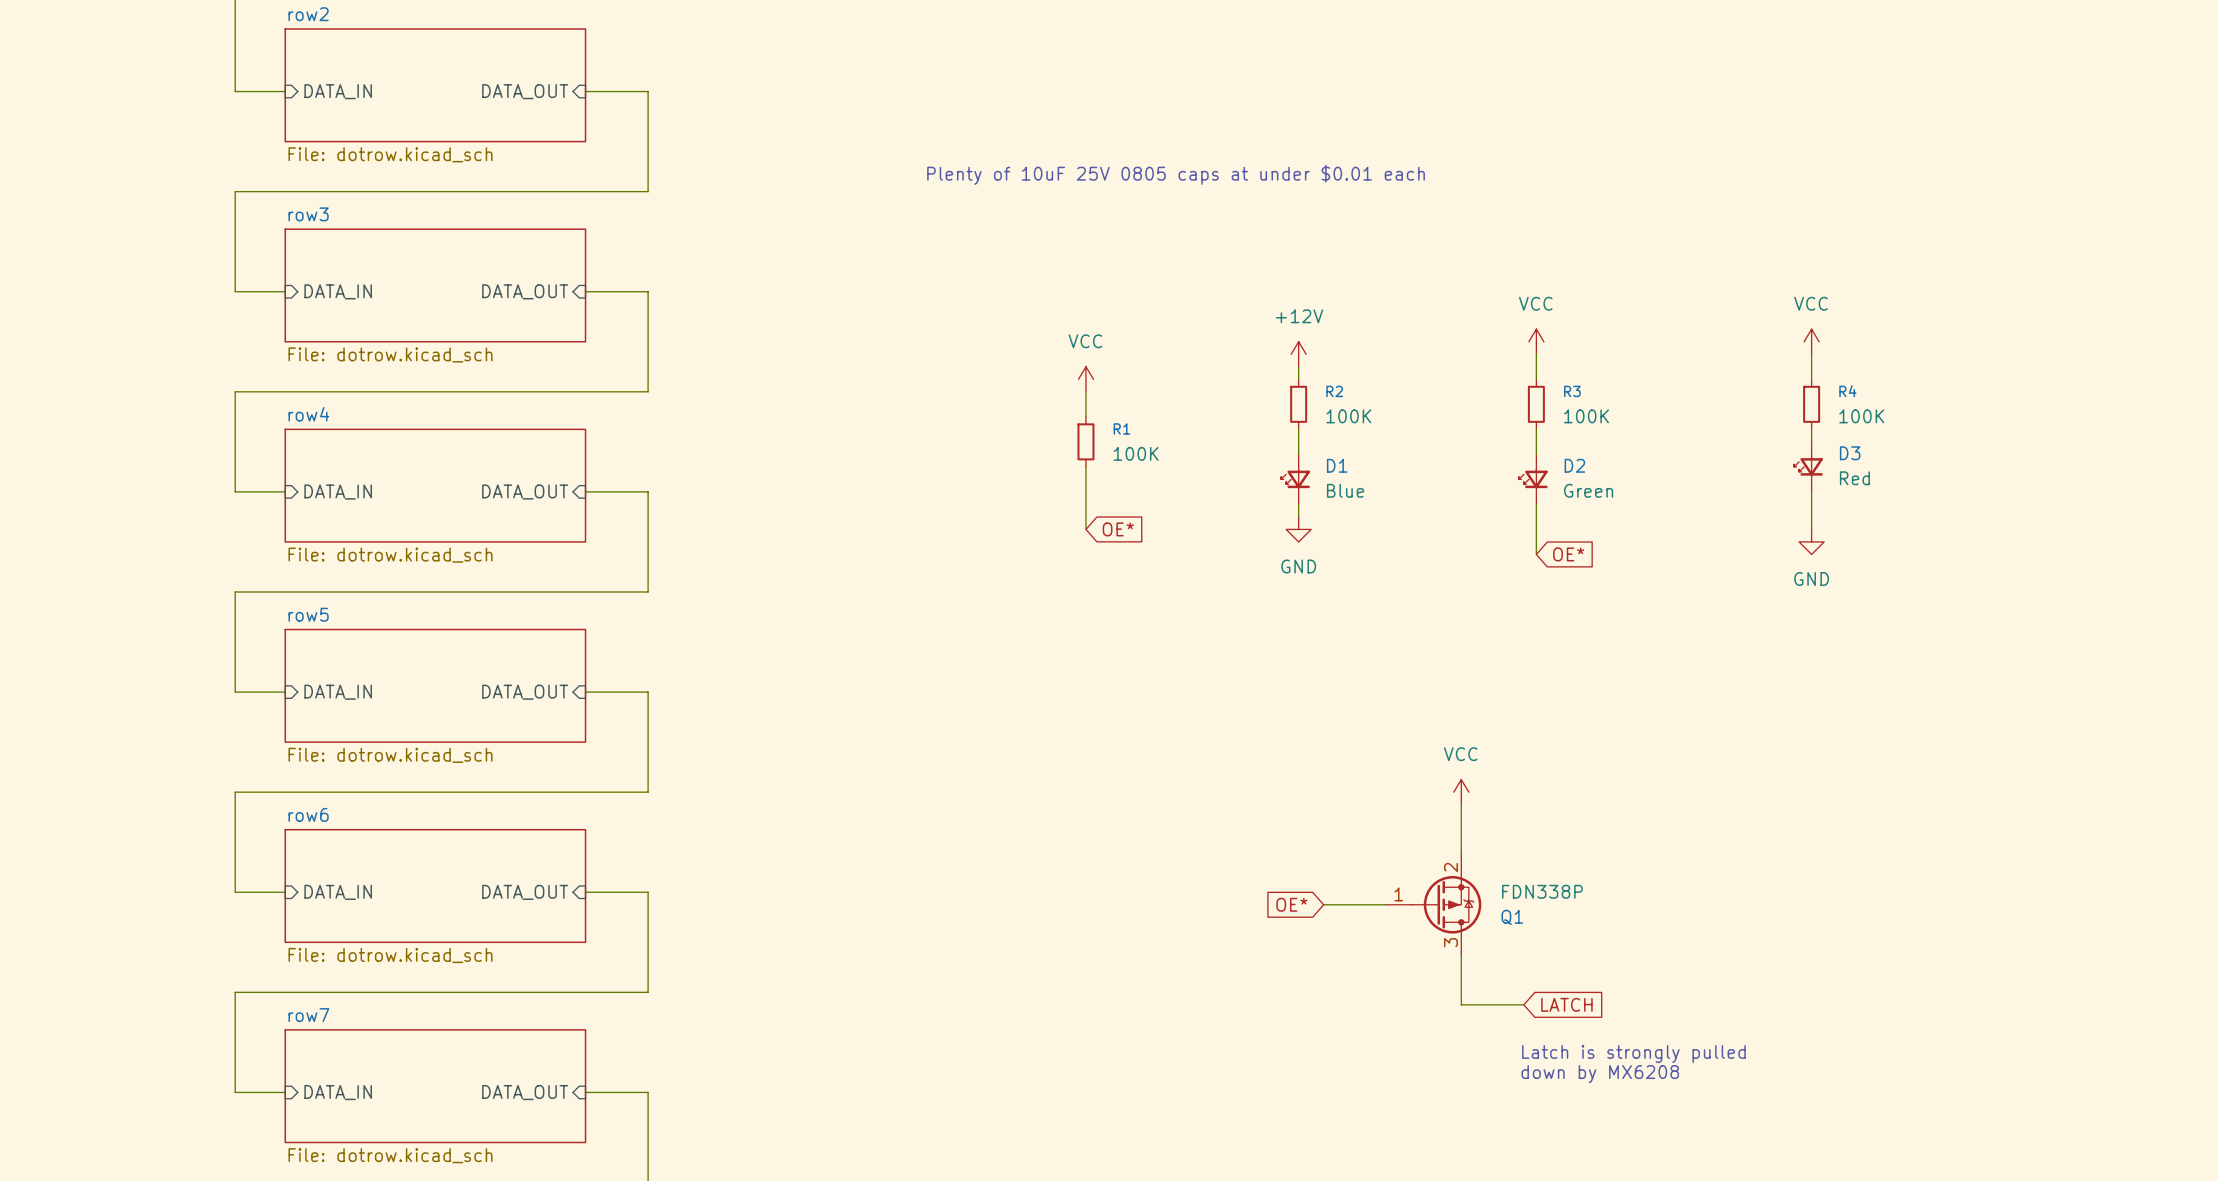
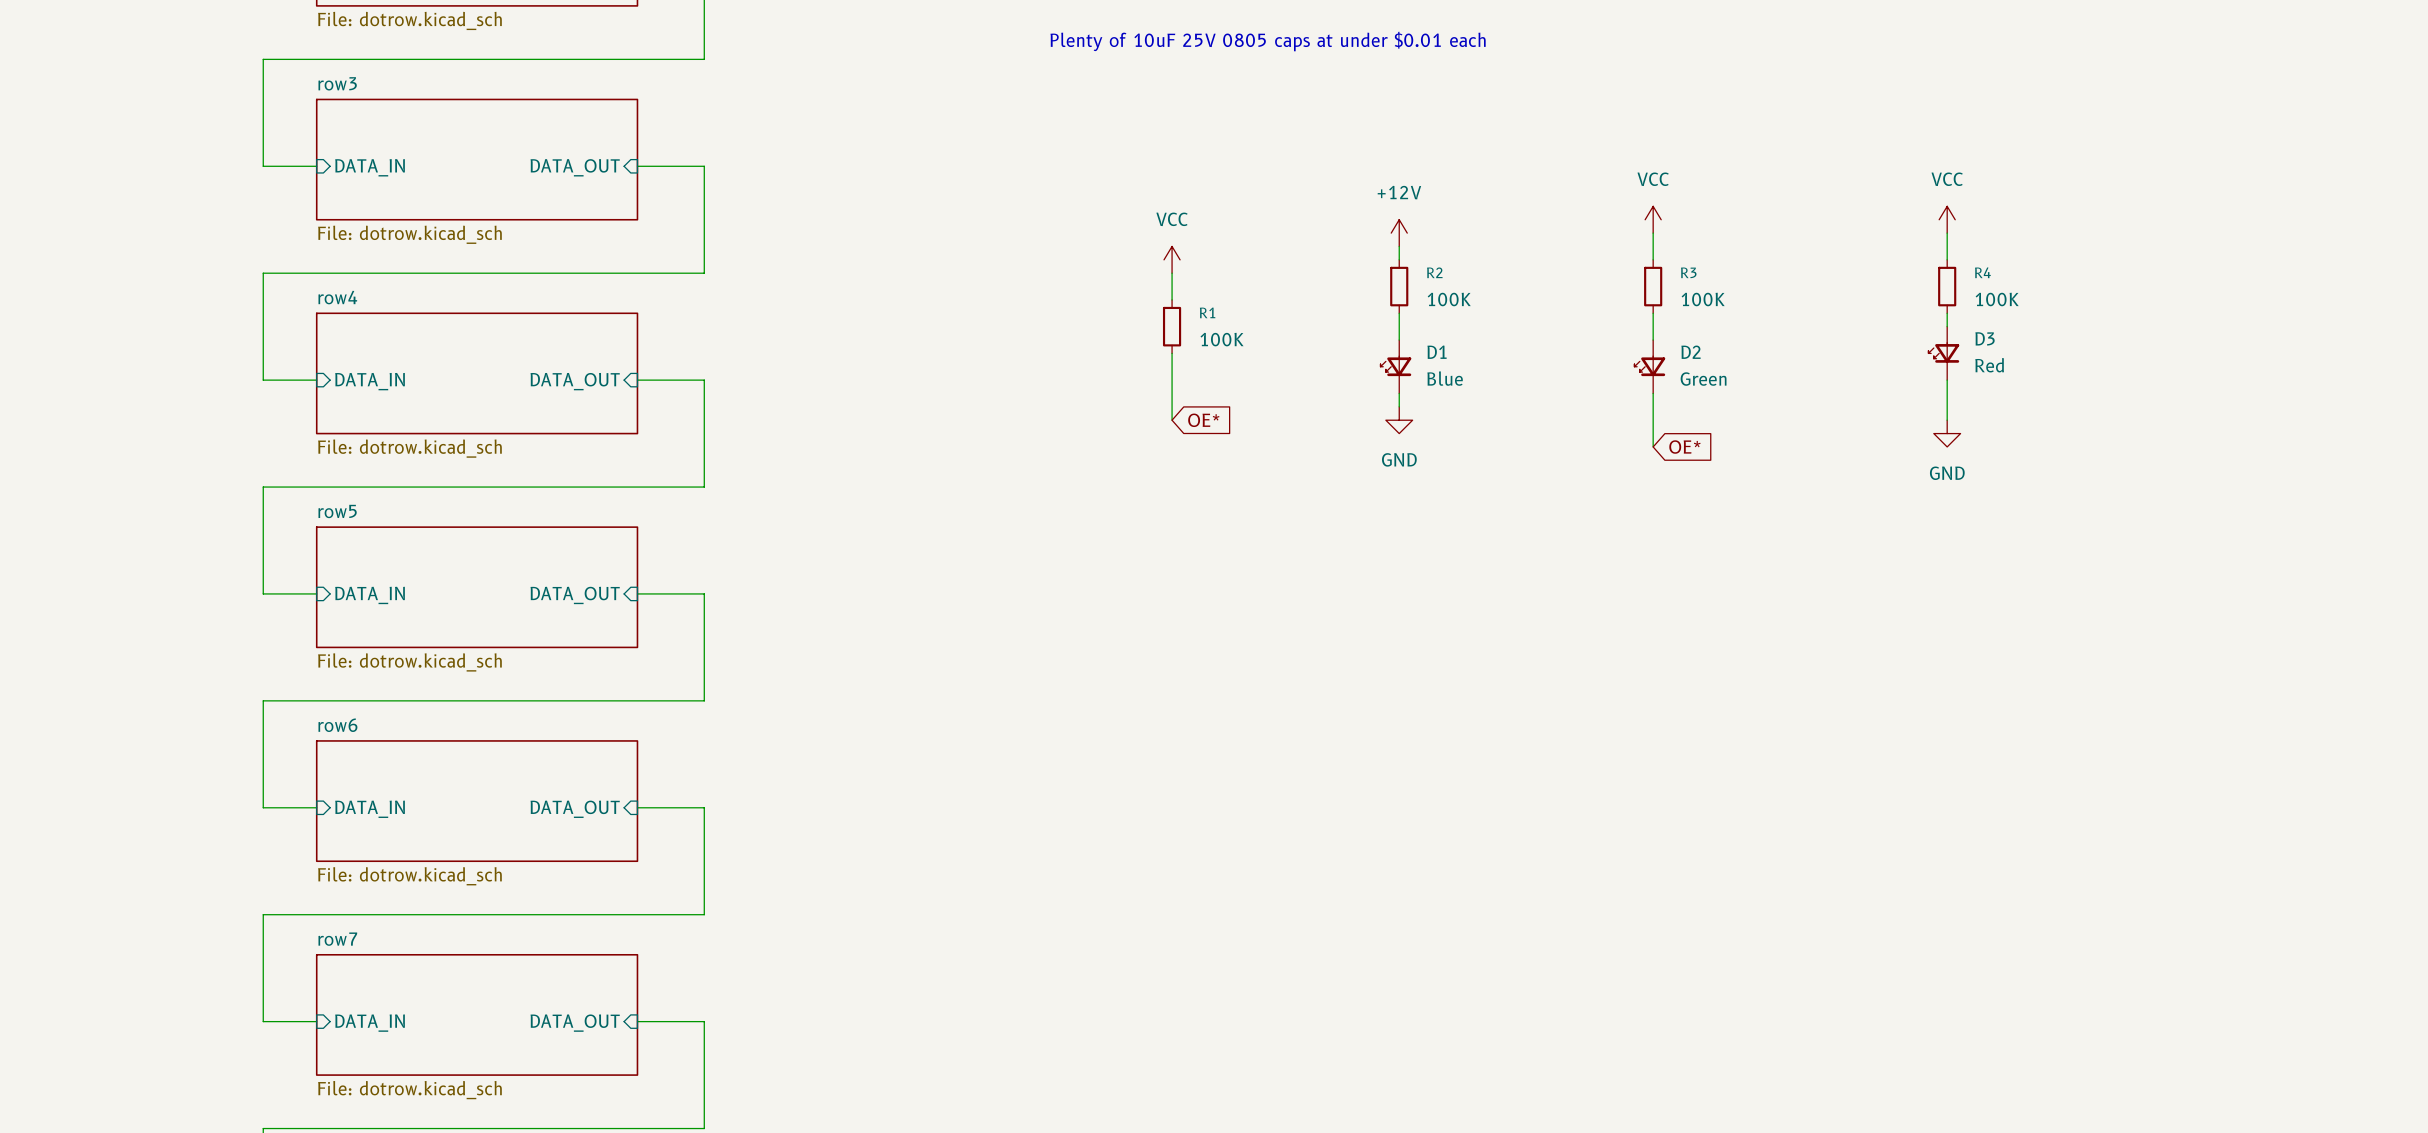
power symbol: VCC (1461, 792) -> none
wire: (1461, 804) (1461, 854) -> none
global label: OE* (1291, 904) -> none
wire: (1323, 904) (1386, 904) -> none
Q1: FDN338P (1433, 904) -> none
wire: (1461, 954) (1461, 1004) (1523, 1004) -> none
global label: LATCH (1566, 1004) -> none
text: Latch is strongly pulled (1633, 1053) -> none
text: down by MX6208 (1600, 1074) -> none

